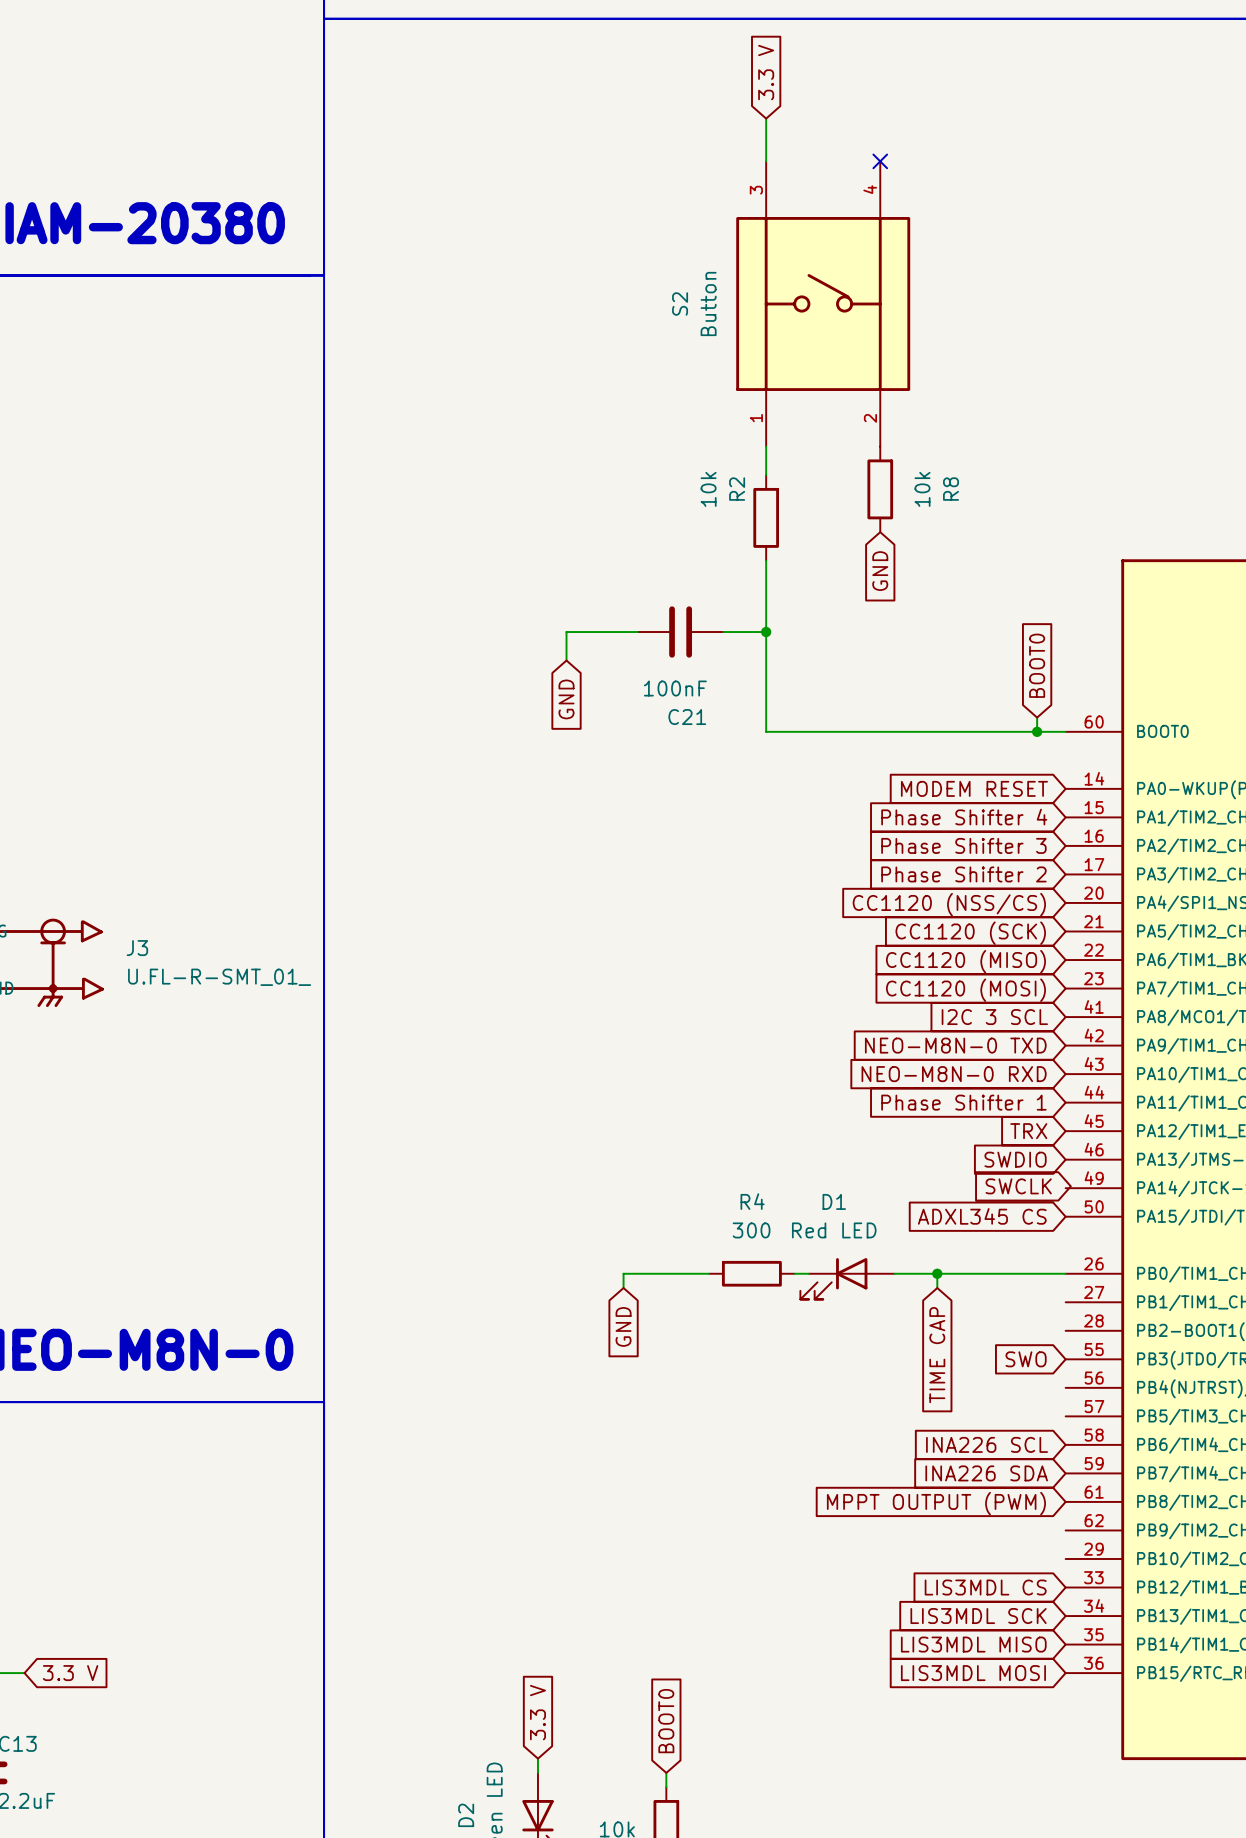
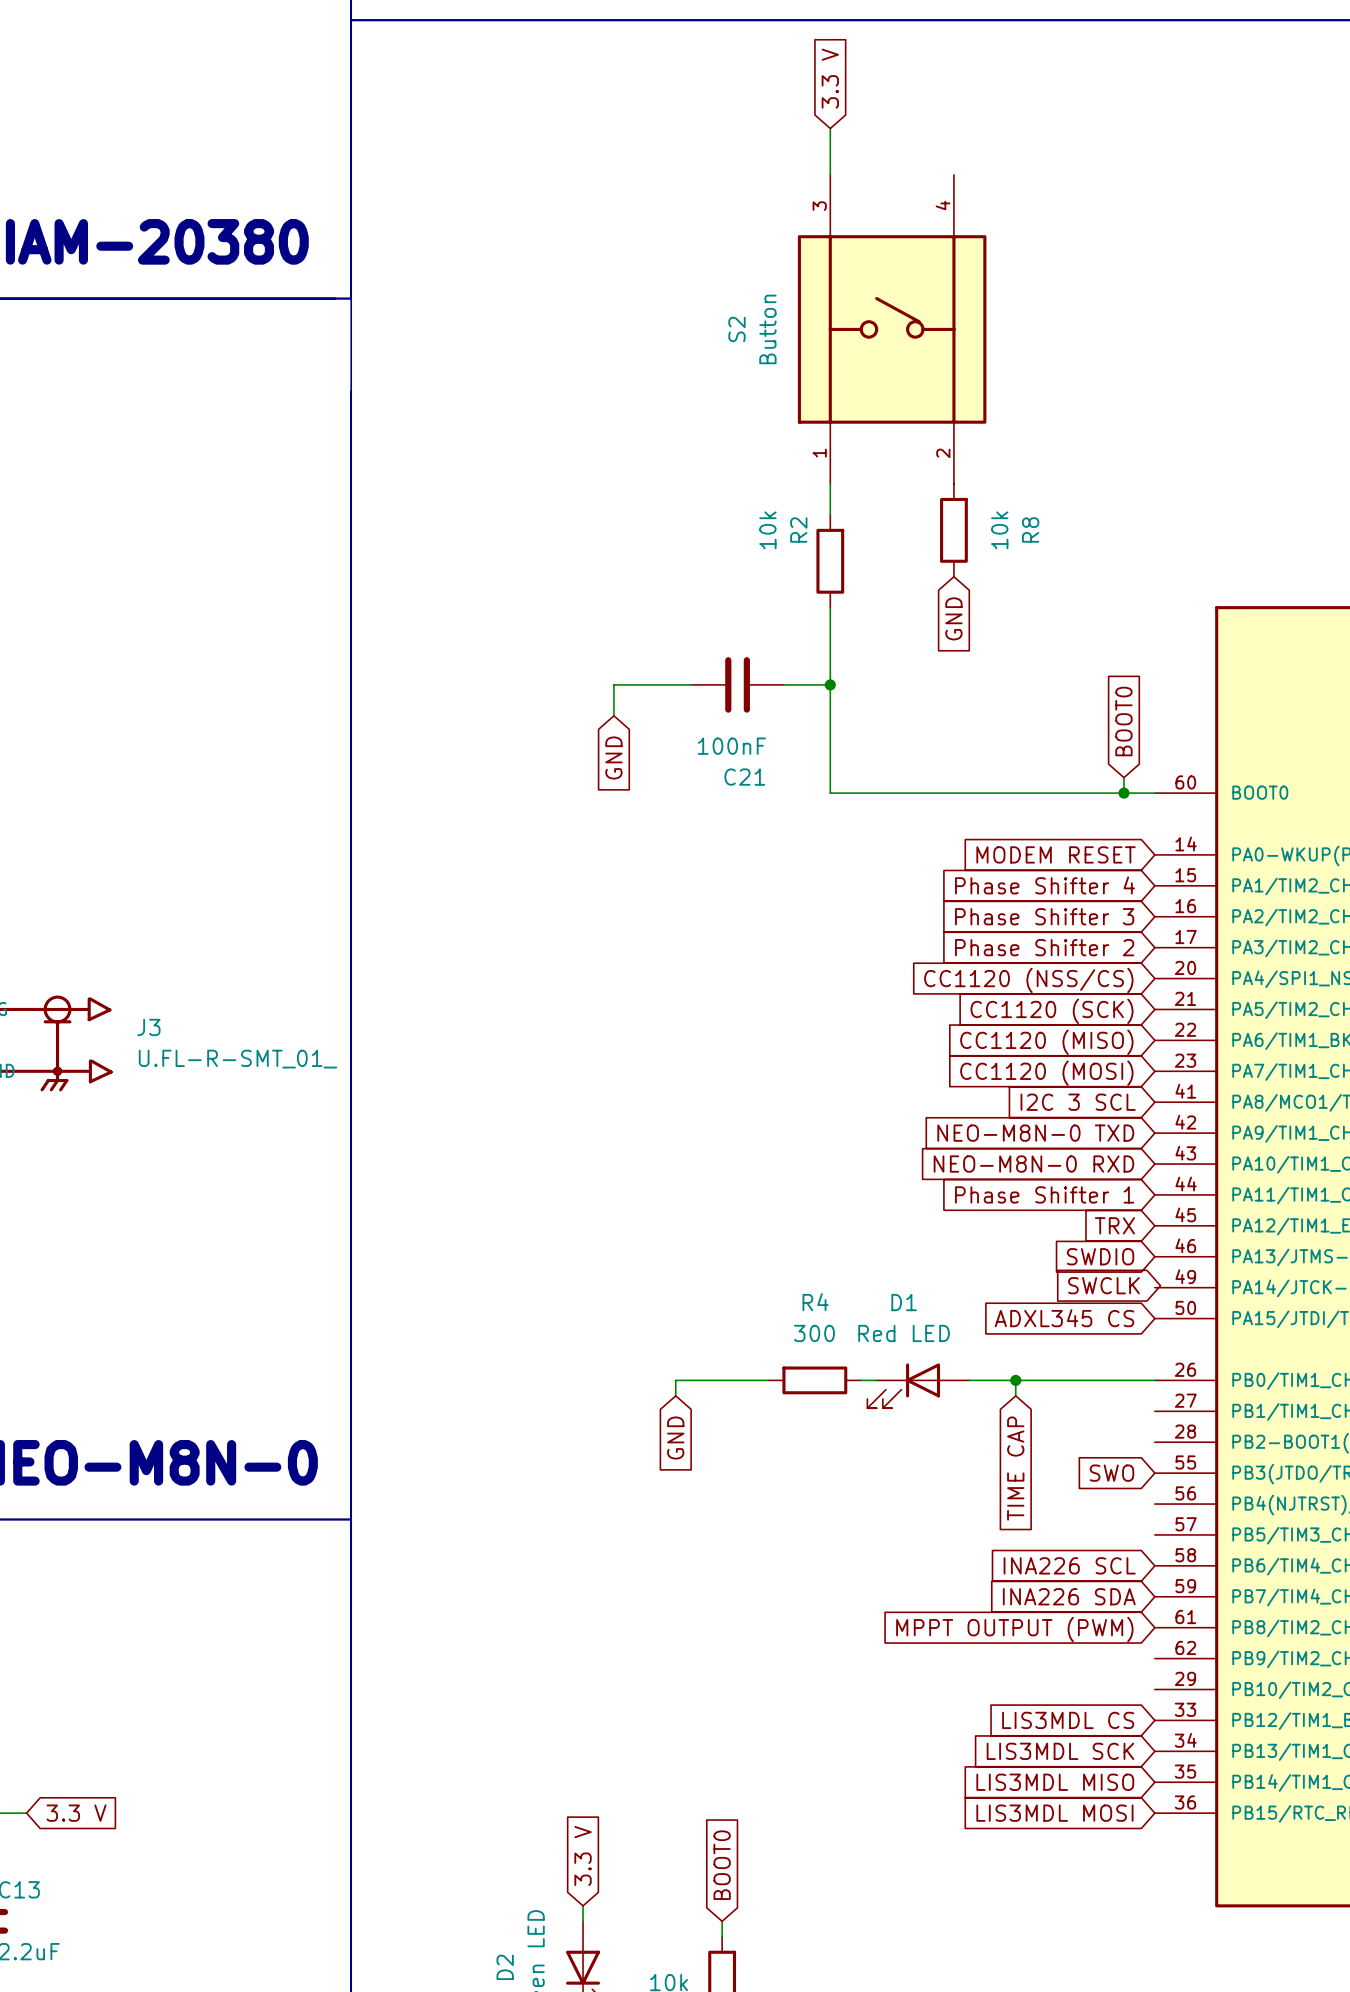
no-connect mark: (880, 161) -> none

